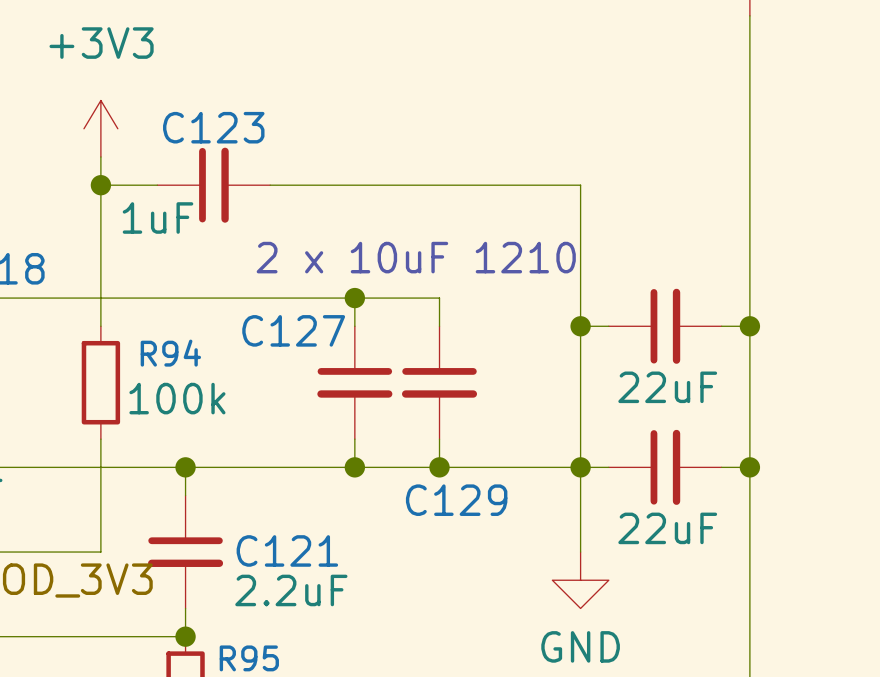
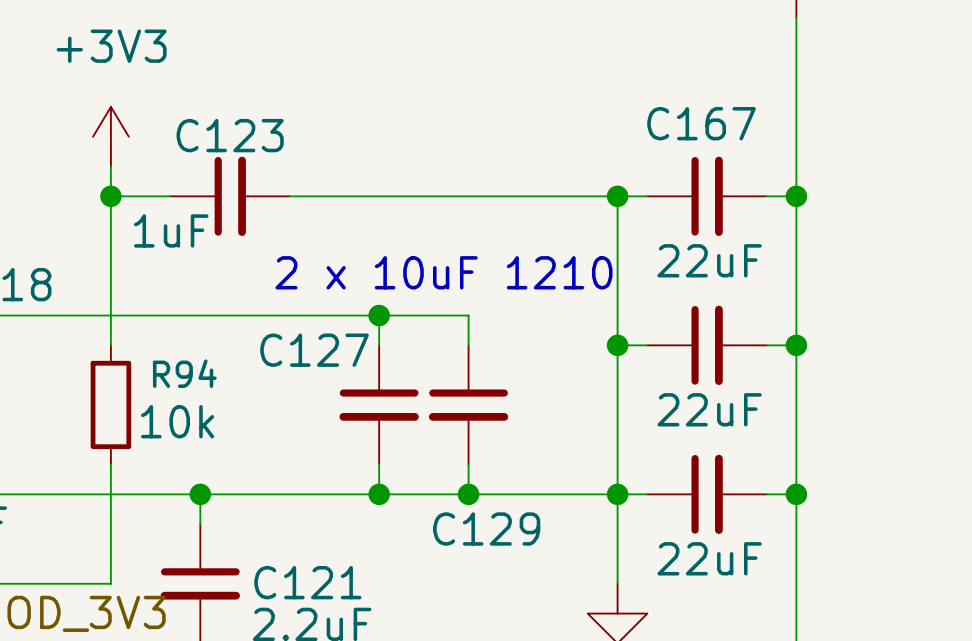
wire: none -> (617, 196) (647, 196)
junction: none -> (617, 196)
C167: none -> 22uF (706, 196)
wire: none -> (766, 196) (796, 196)
junction: none -> (796, 196)
R94 value: 100k (177, 398) -> 10k (177, 421)

